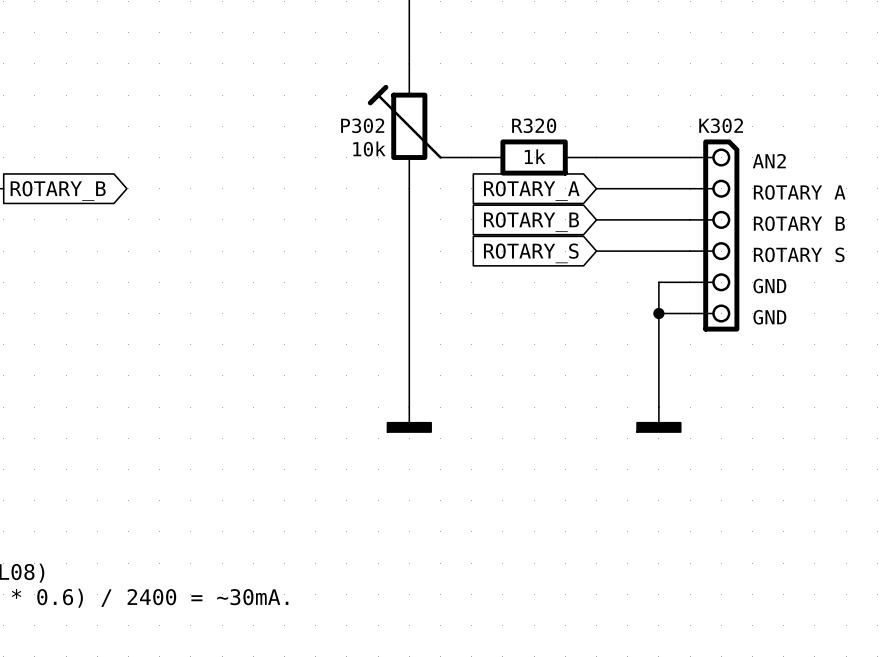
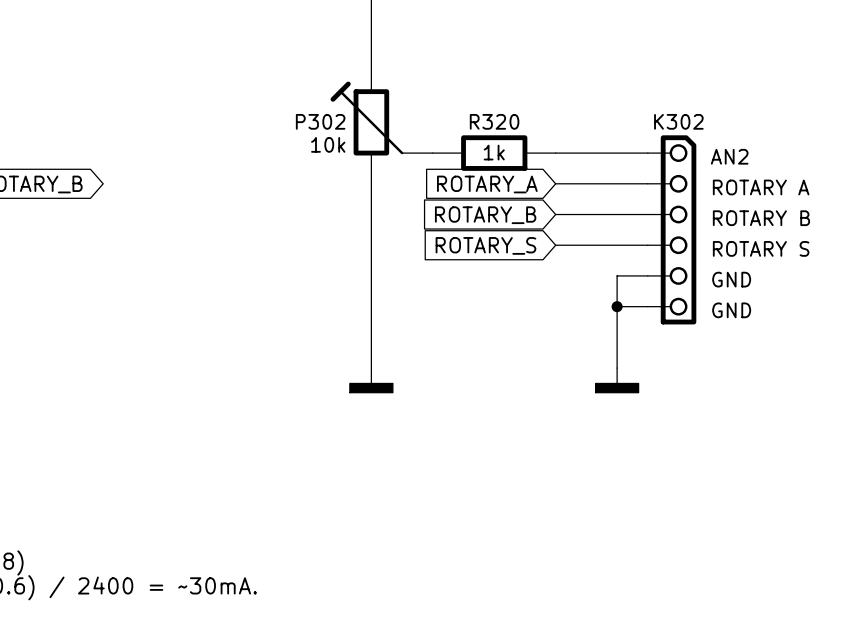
power symbol position: (409, 419) -> (371, 380)
power symbol position: (658, 419) -> (617, 380)

